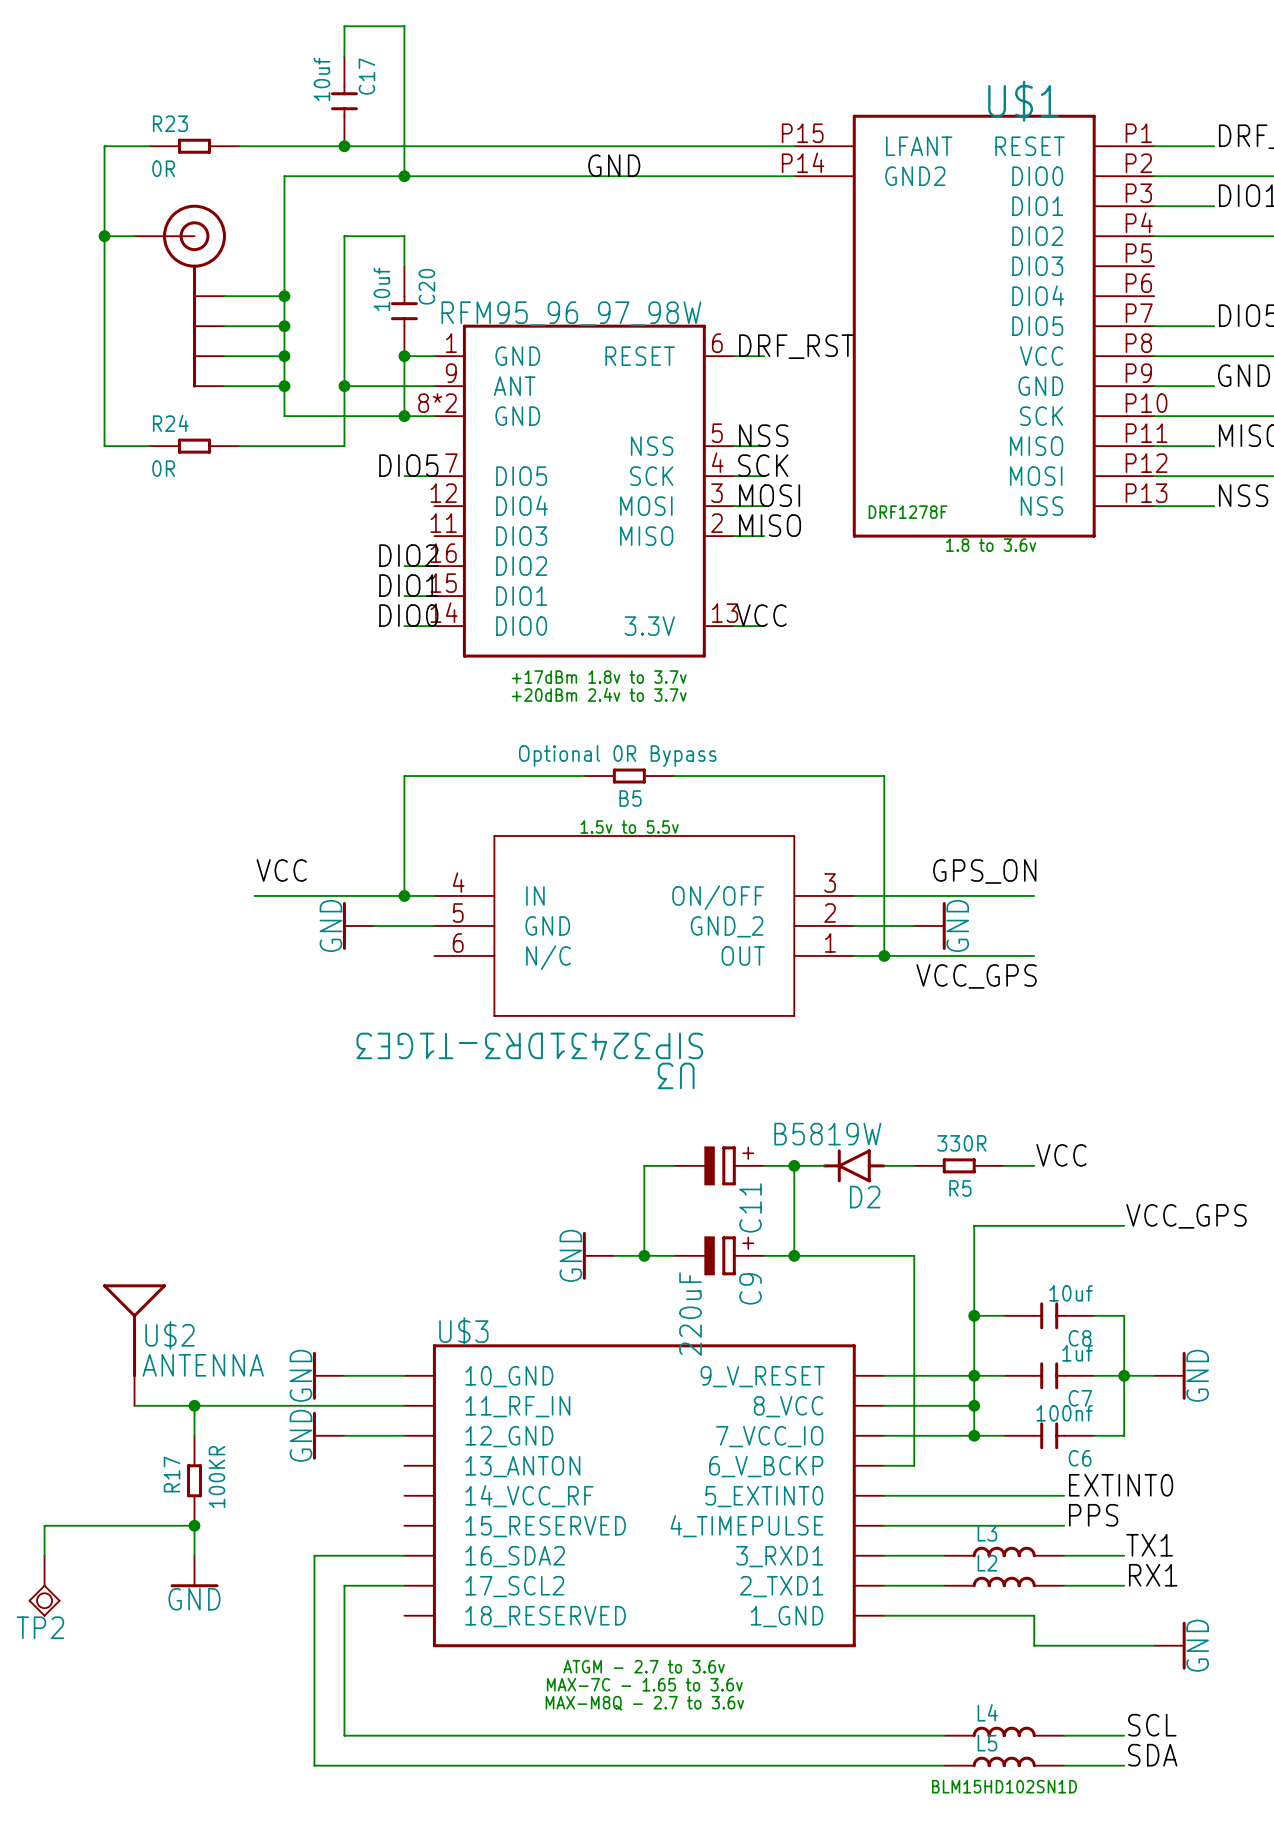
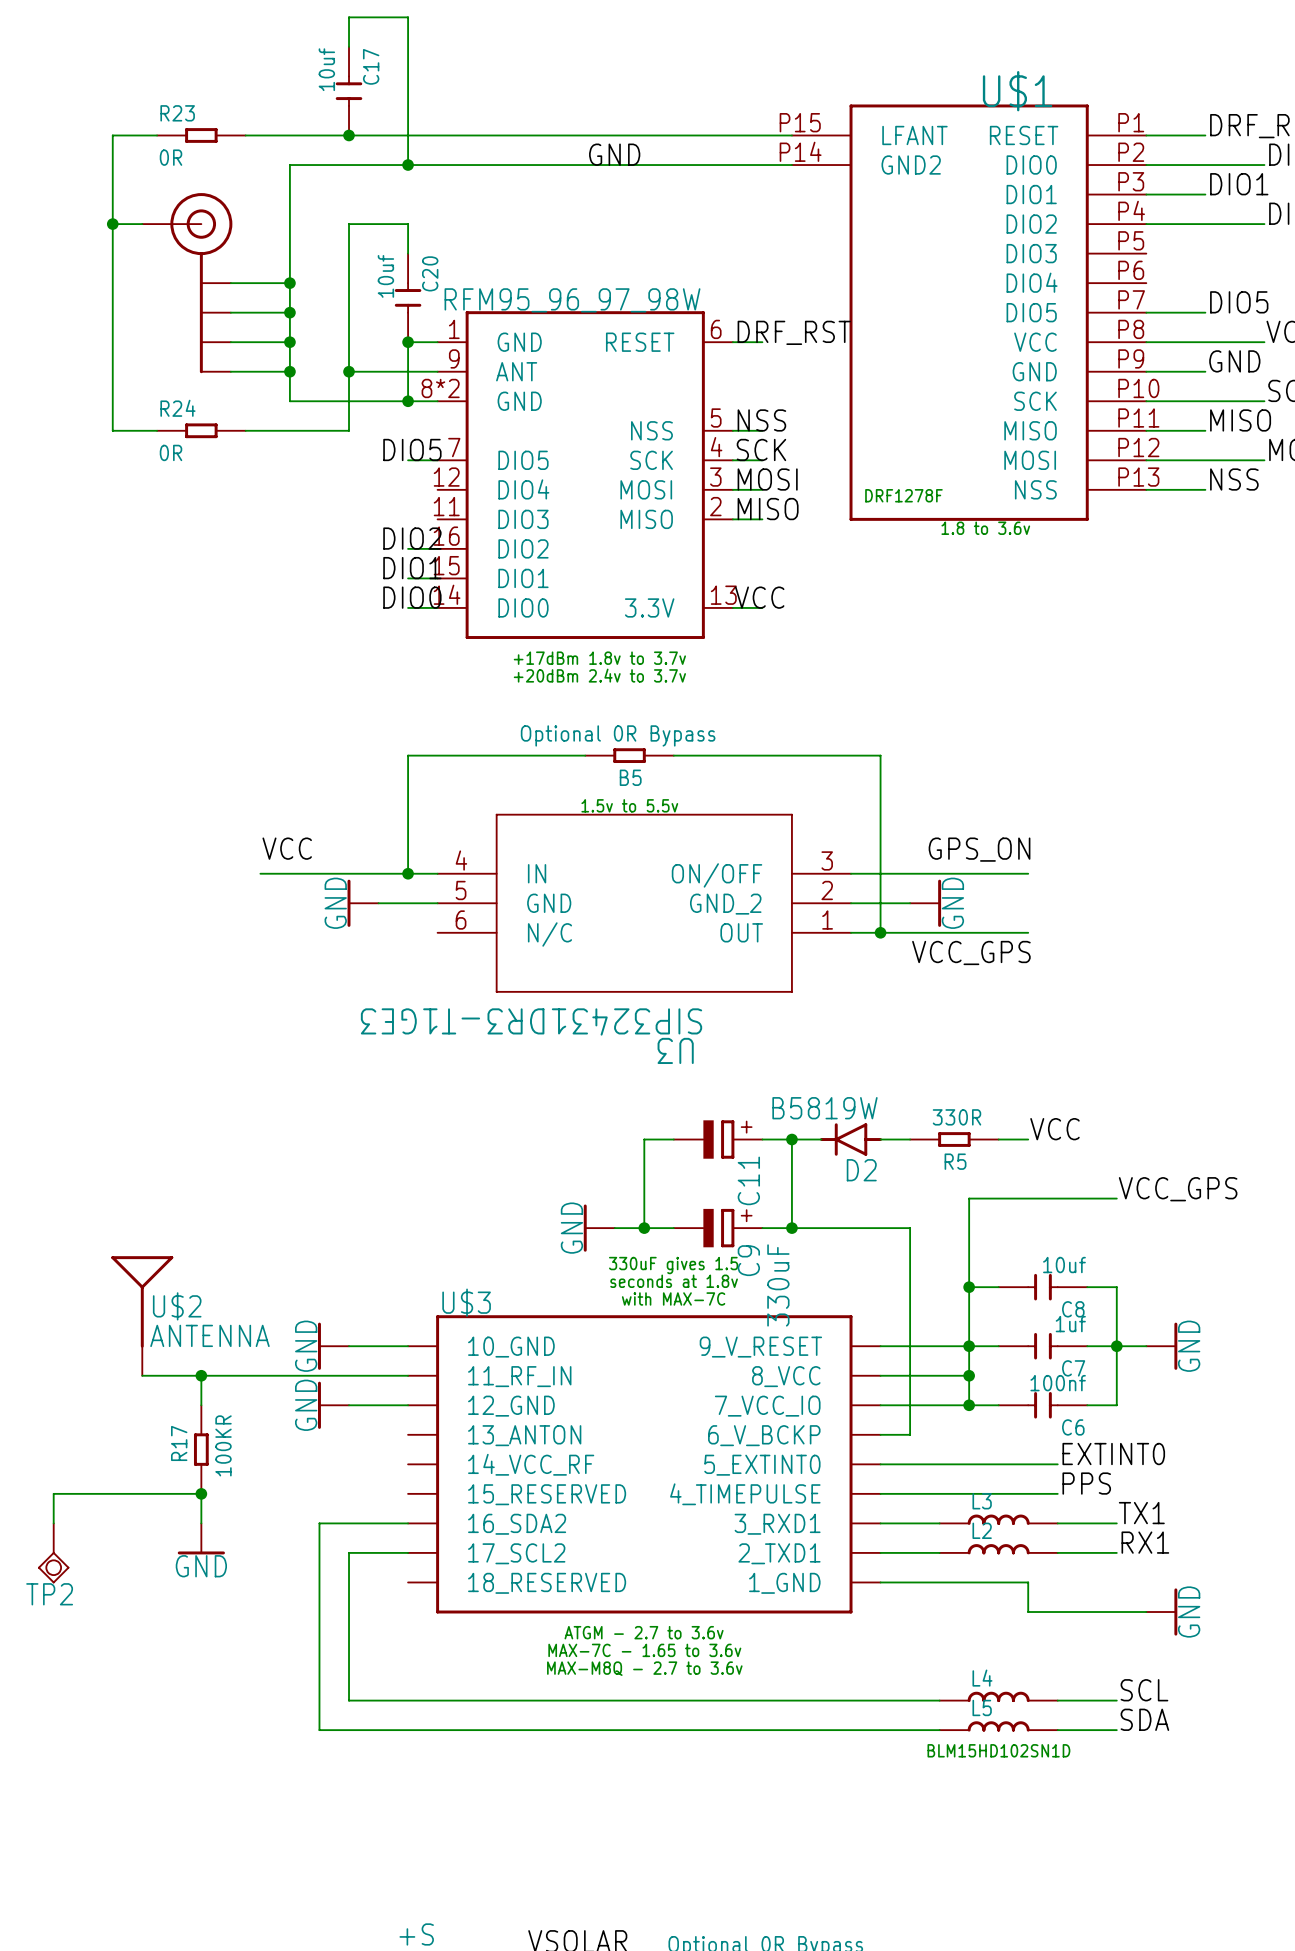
text: none -> 330uF gives 1.5 (673, 1265)
text: none -> seconds at 1.8v (674, 1281)
C9 value: 220uF (690, 1314) -> 330uF (778, 1285)
text: none -> with MAX-7C (673, 1298)

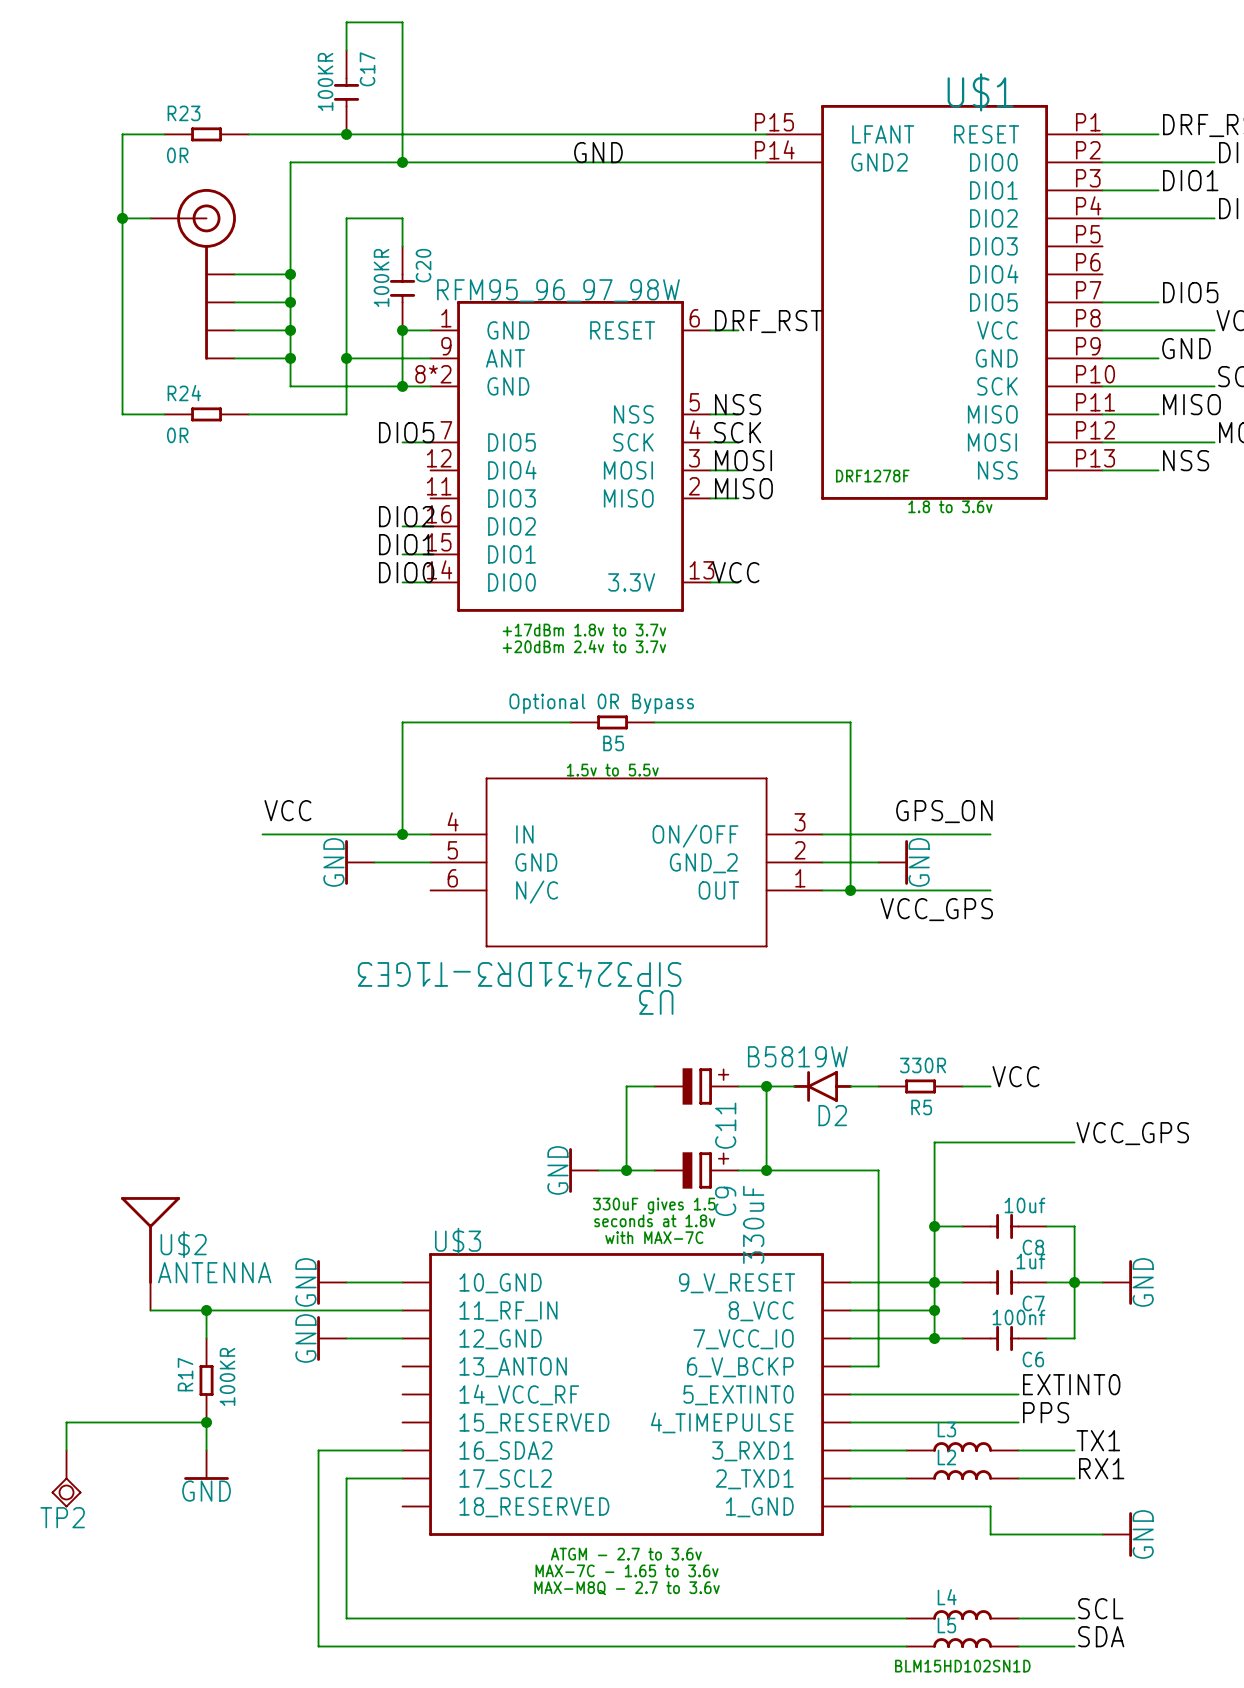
C17 value: 10uf (326, 69) -> 100KR (325, 81)
C20 value: 10uf (385, 276) -> 100KR (381, 277)

